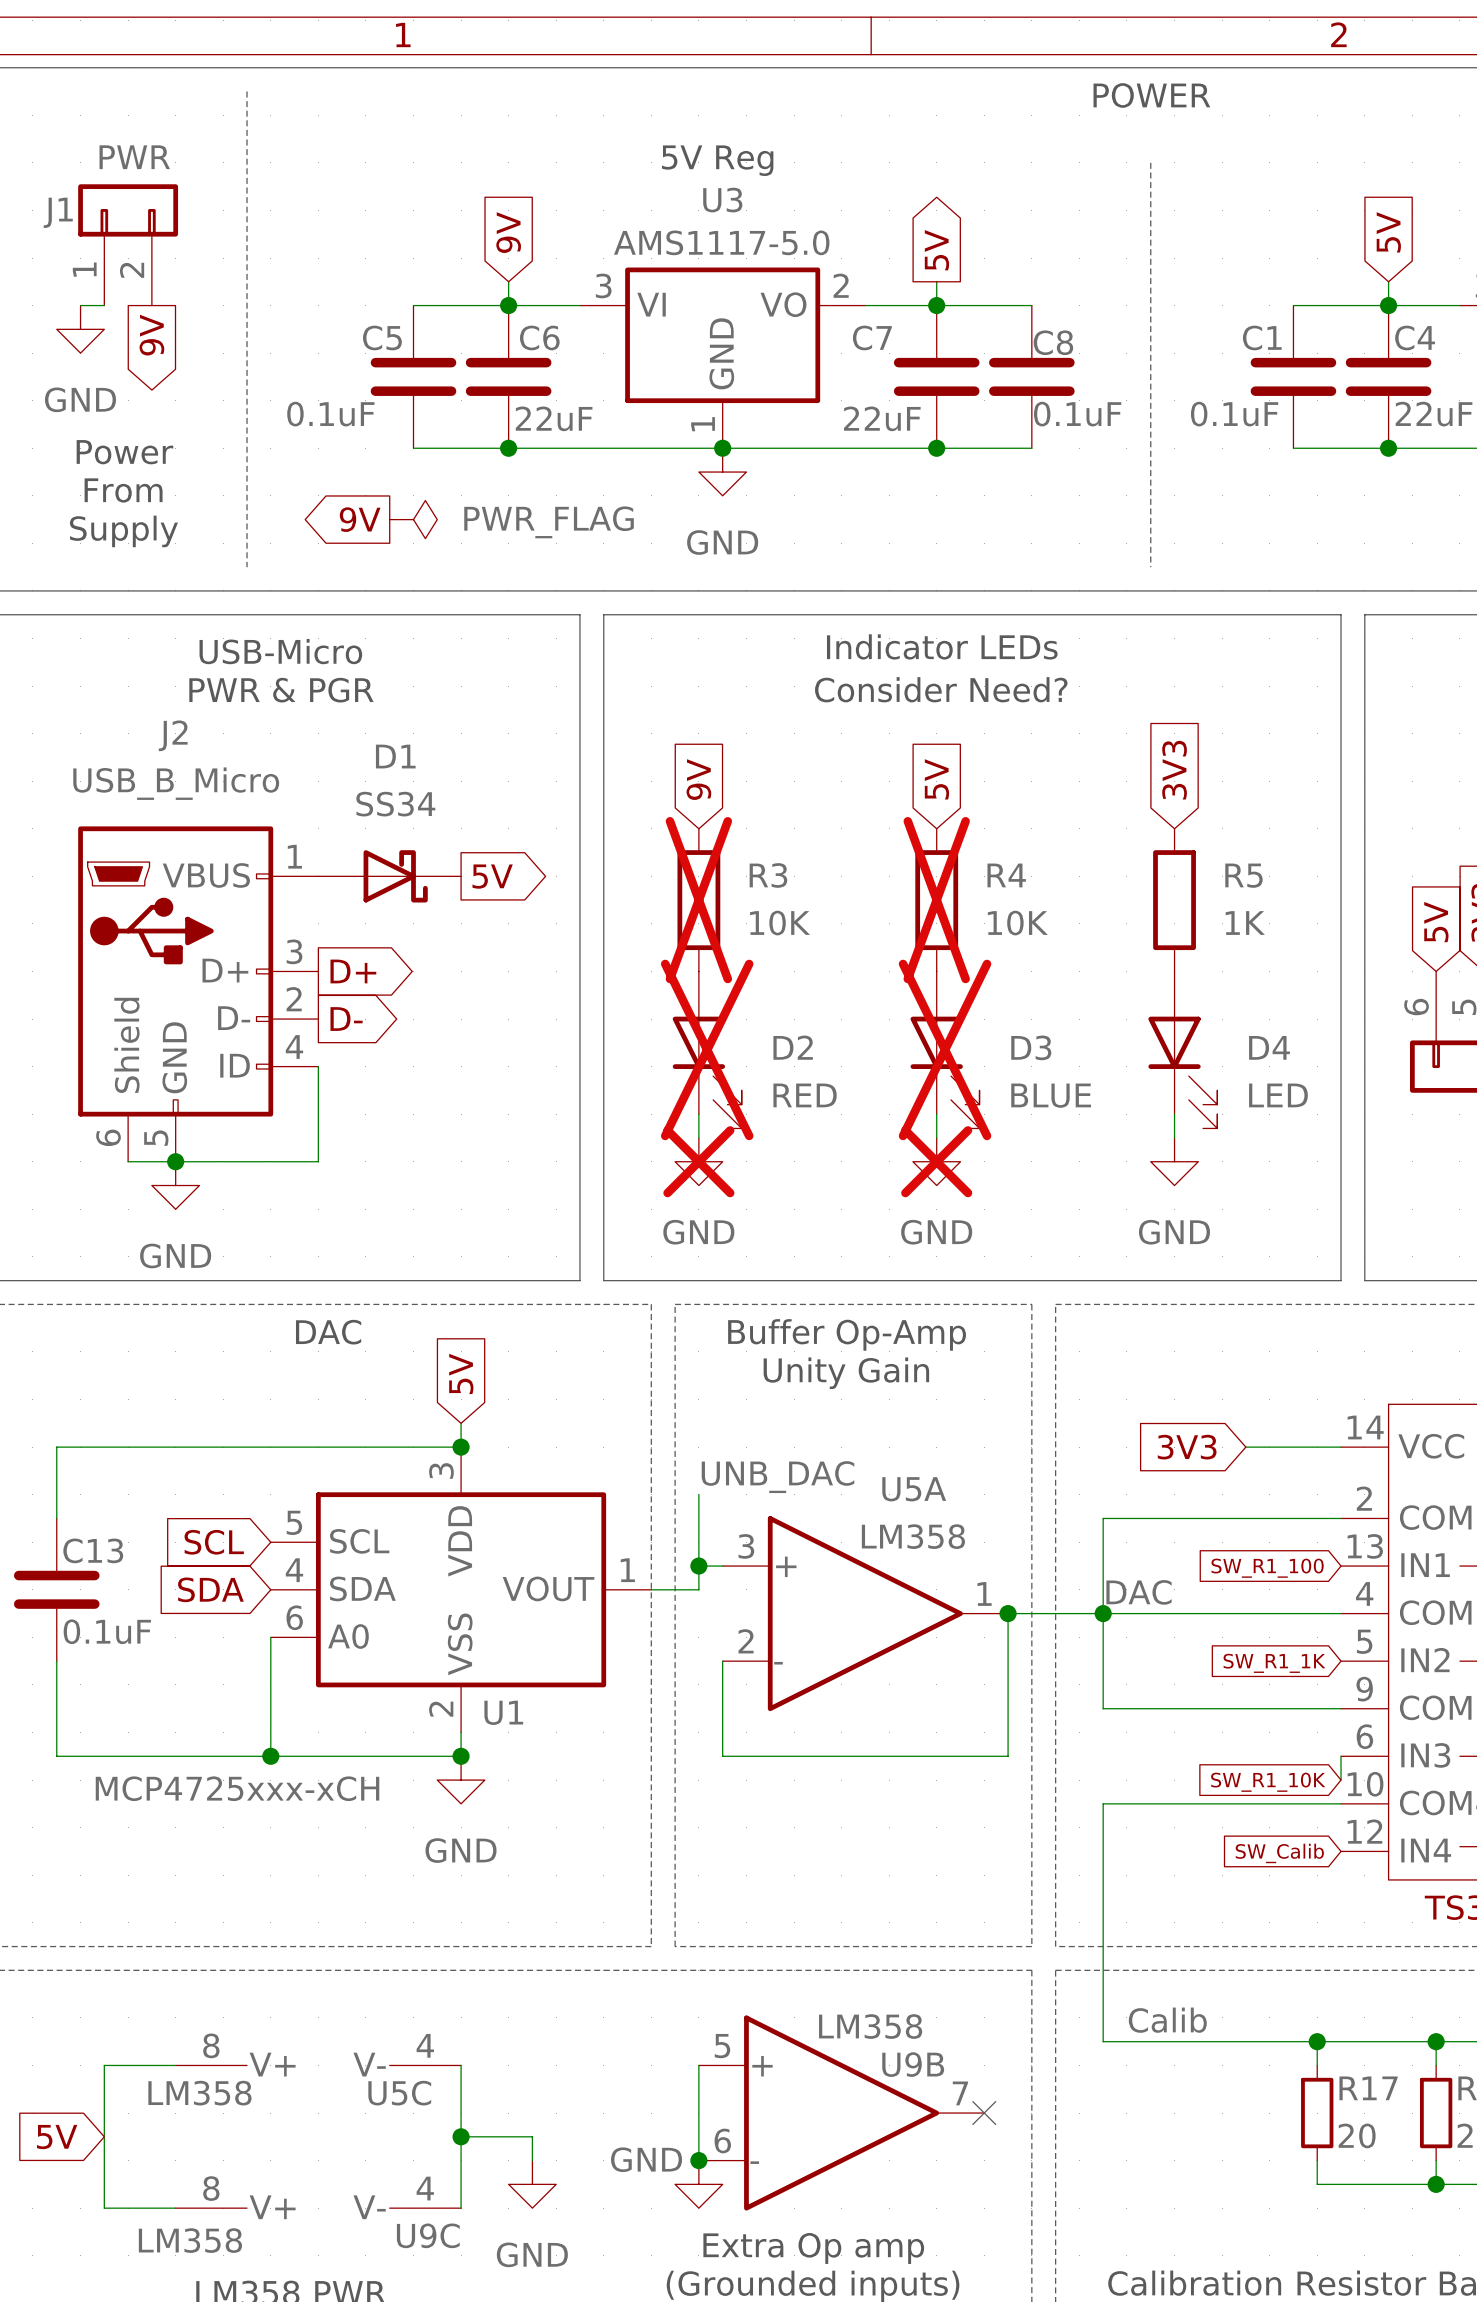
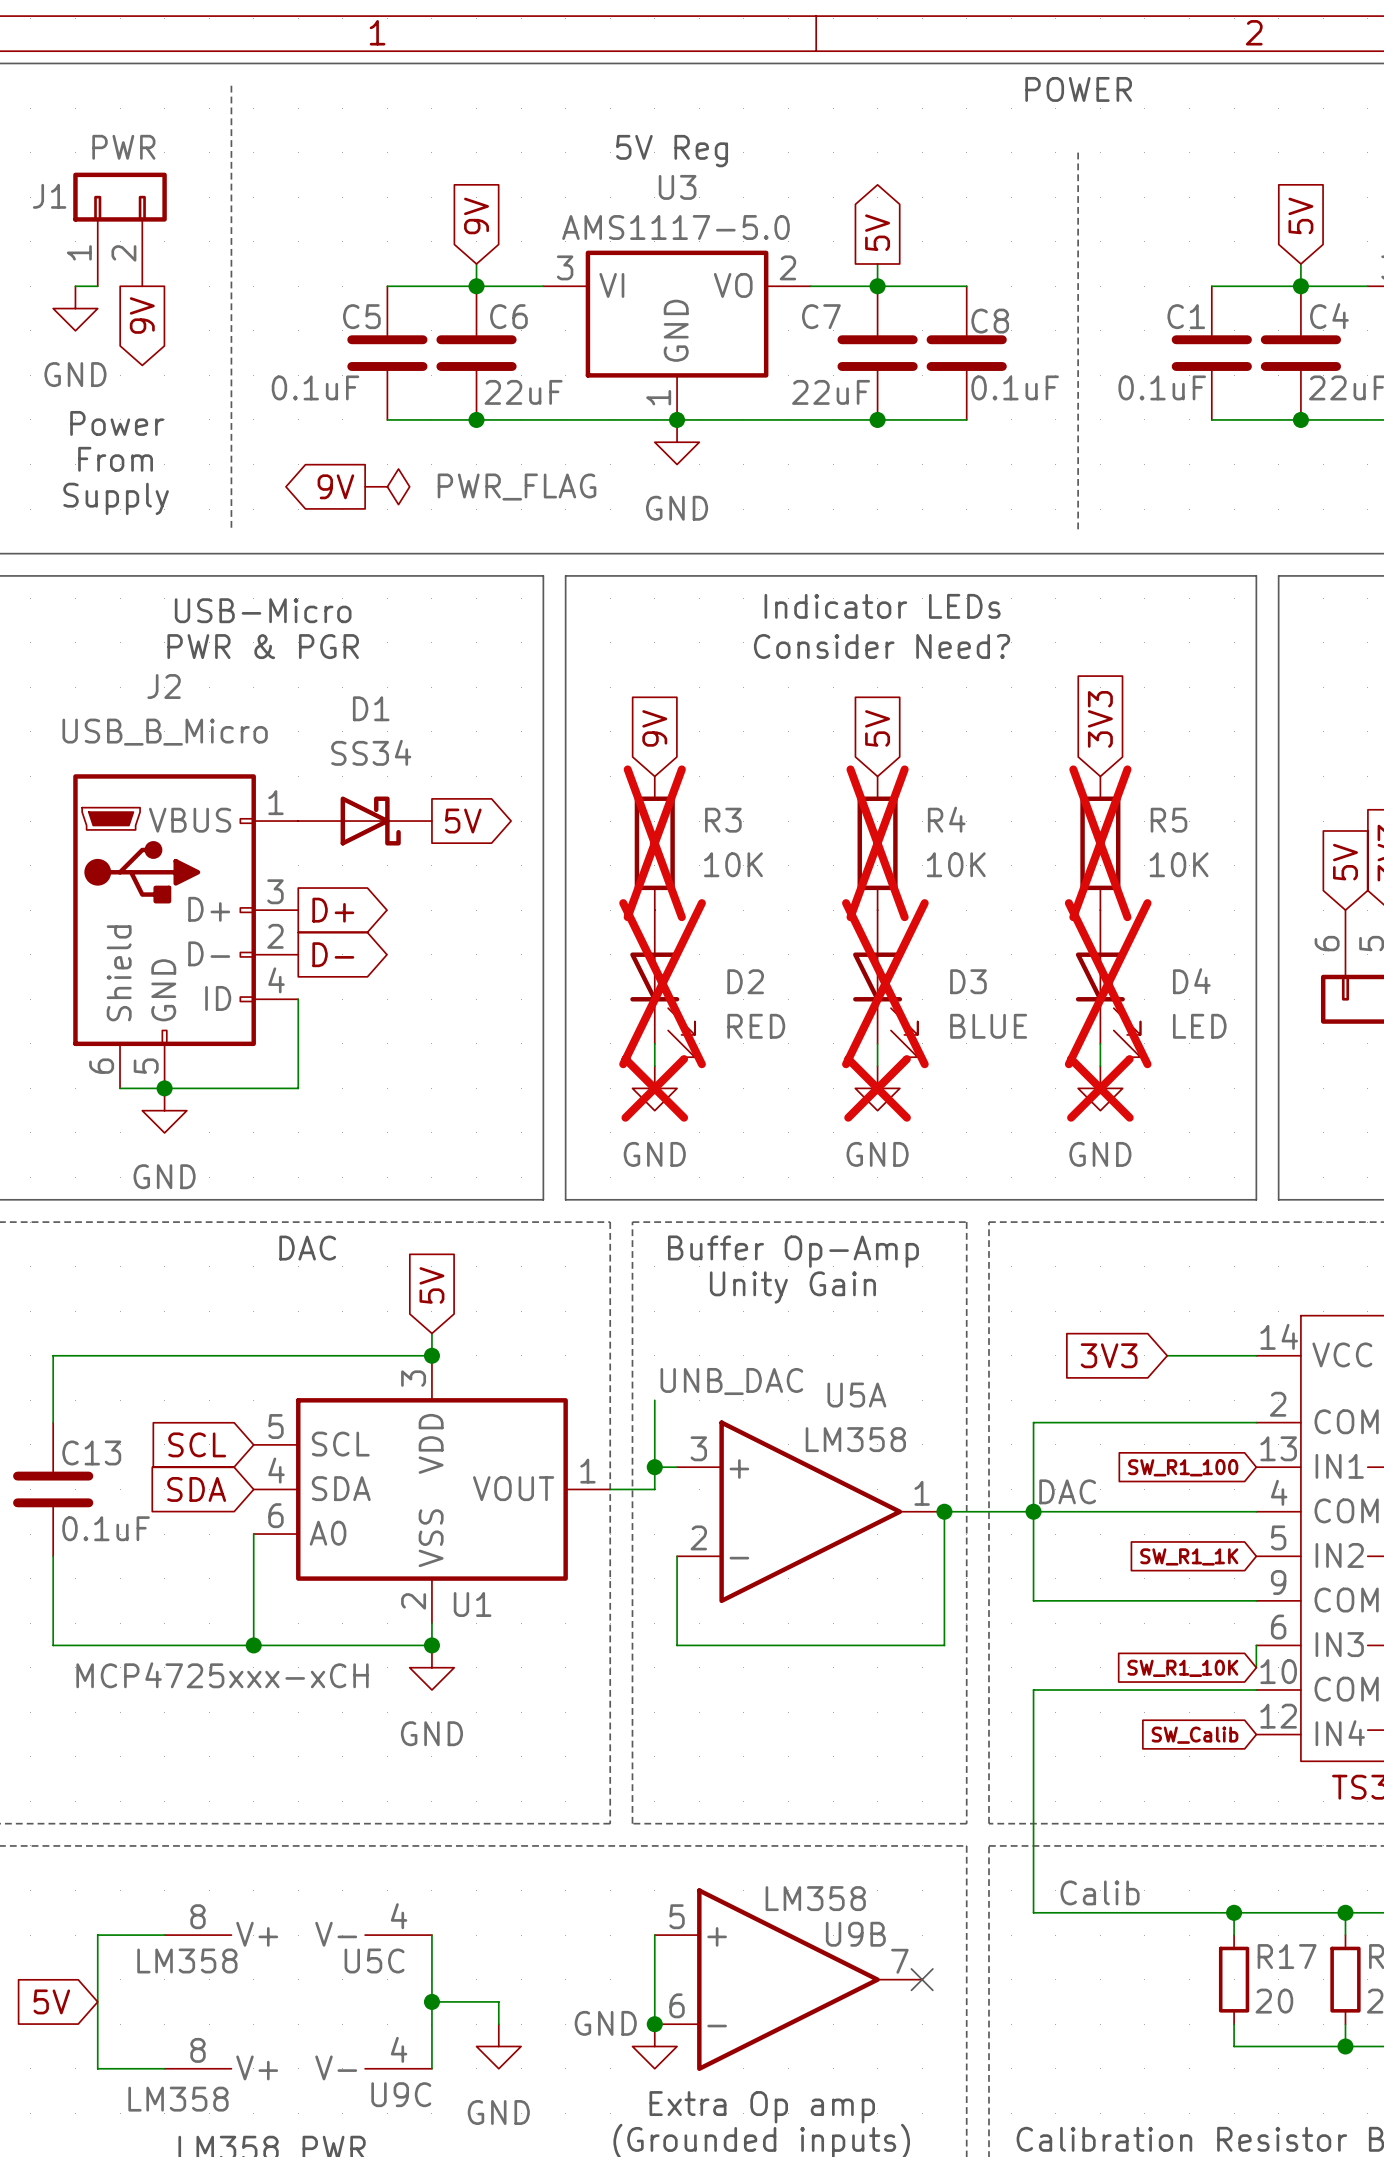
R5 do-not-place cross: none -> (1100, 843)
R5 value: 1K (1245, 923) -> 10K (1179, 864)
D4 do-not-place cross: none -> (1108, 983)
power symbol do-not-place cross: none -> (1100, 1088)

